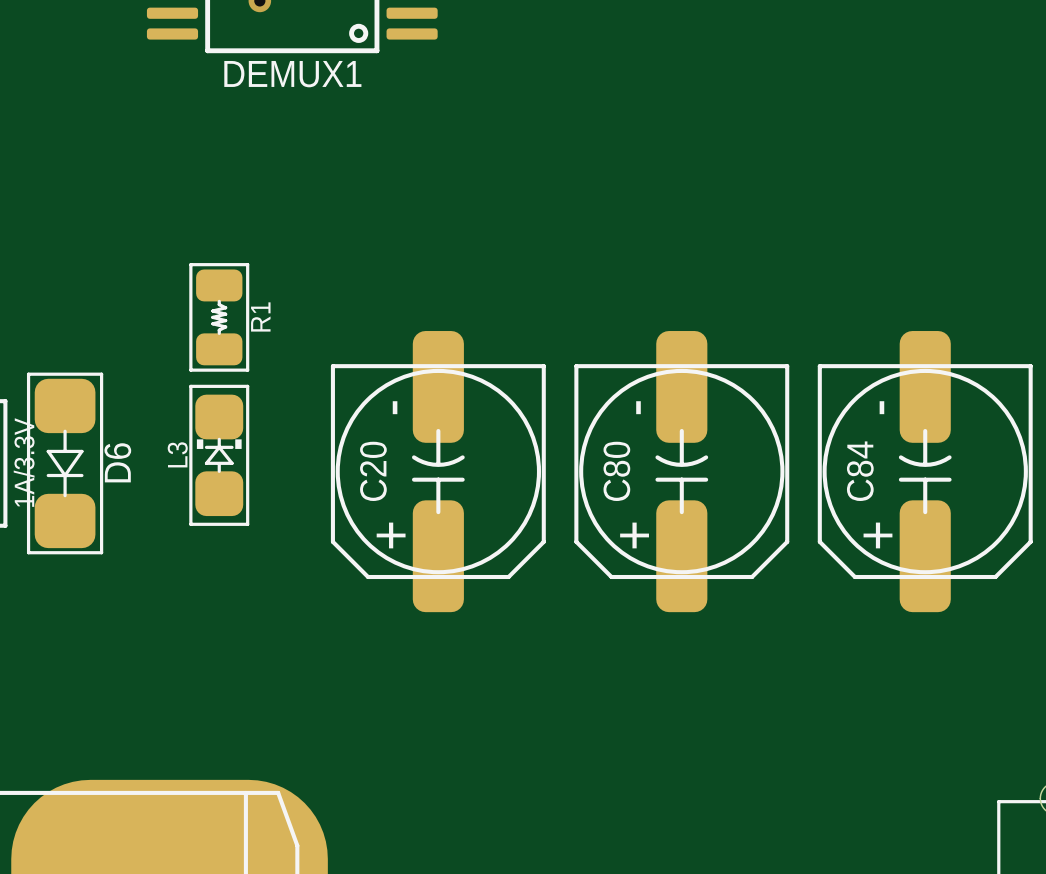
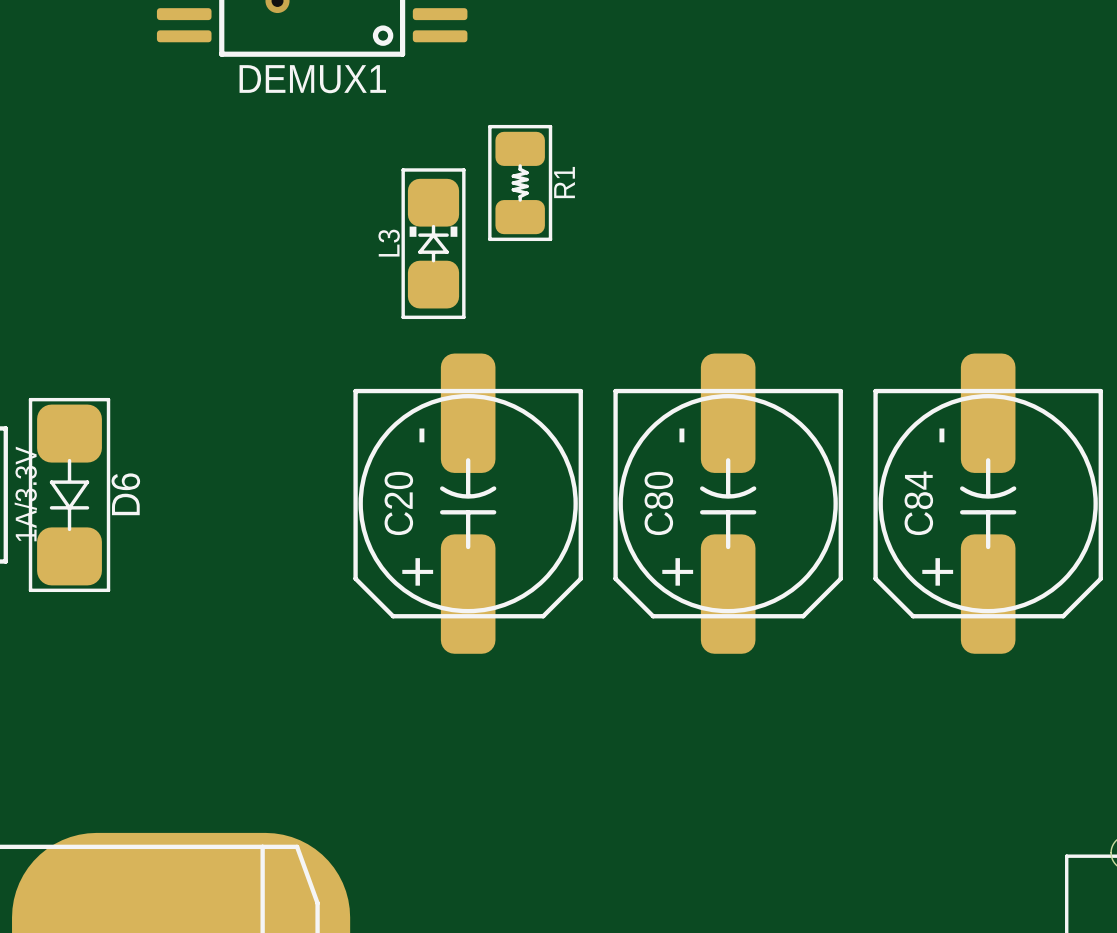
R1 position: (219, 317) -> (520, 182)
L3 position: (219, 455) -> (433, 243)

